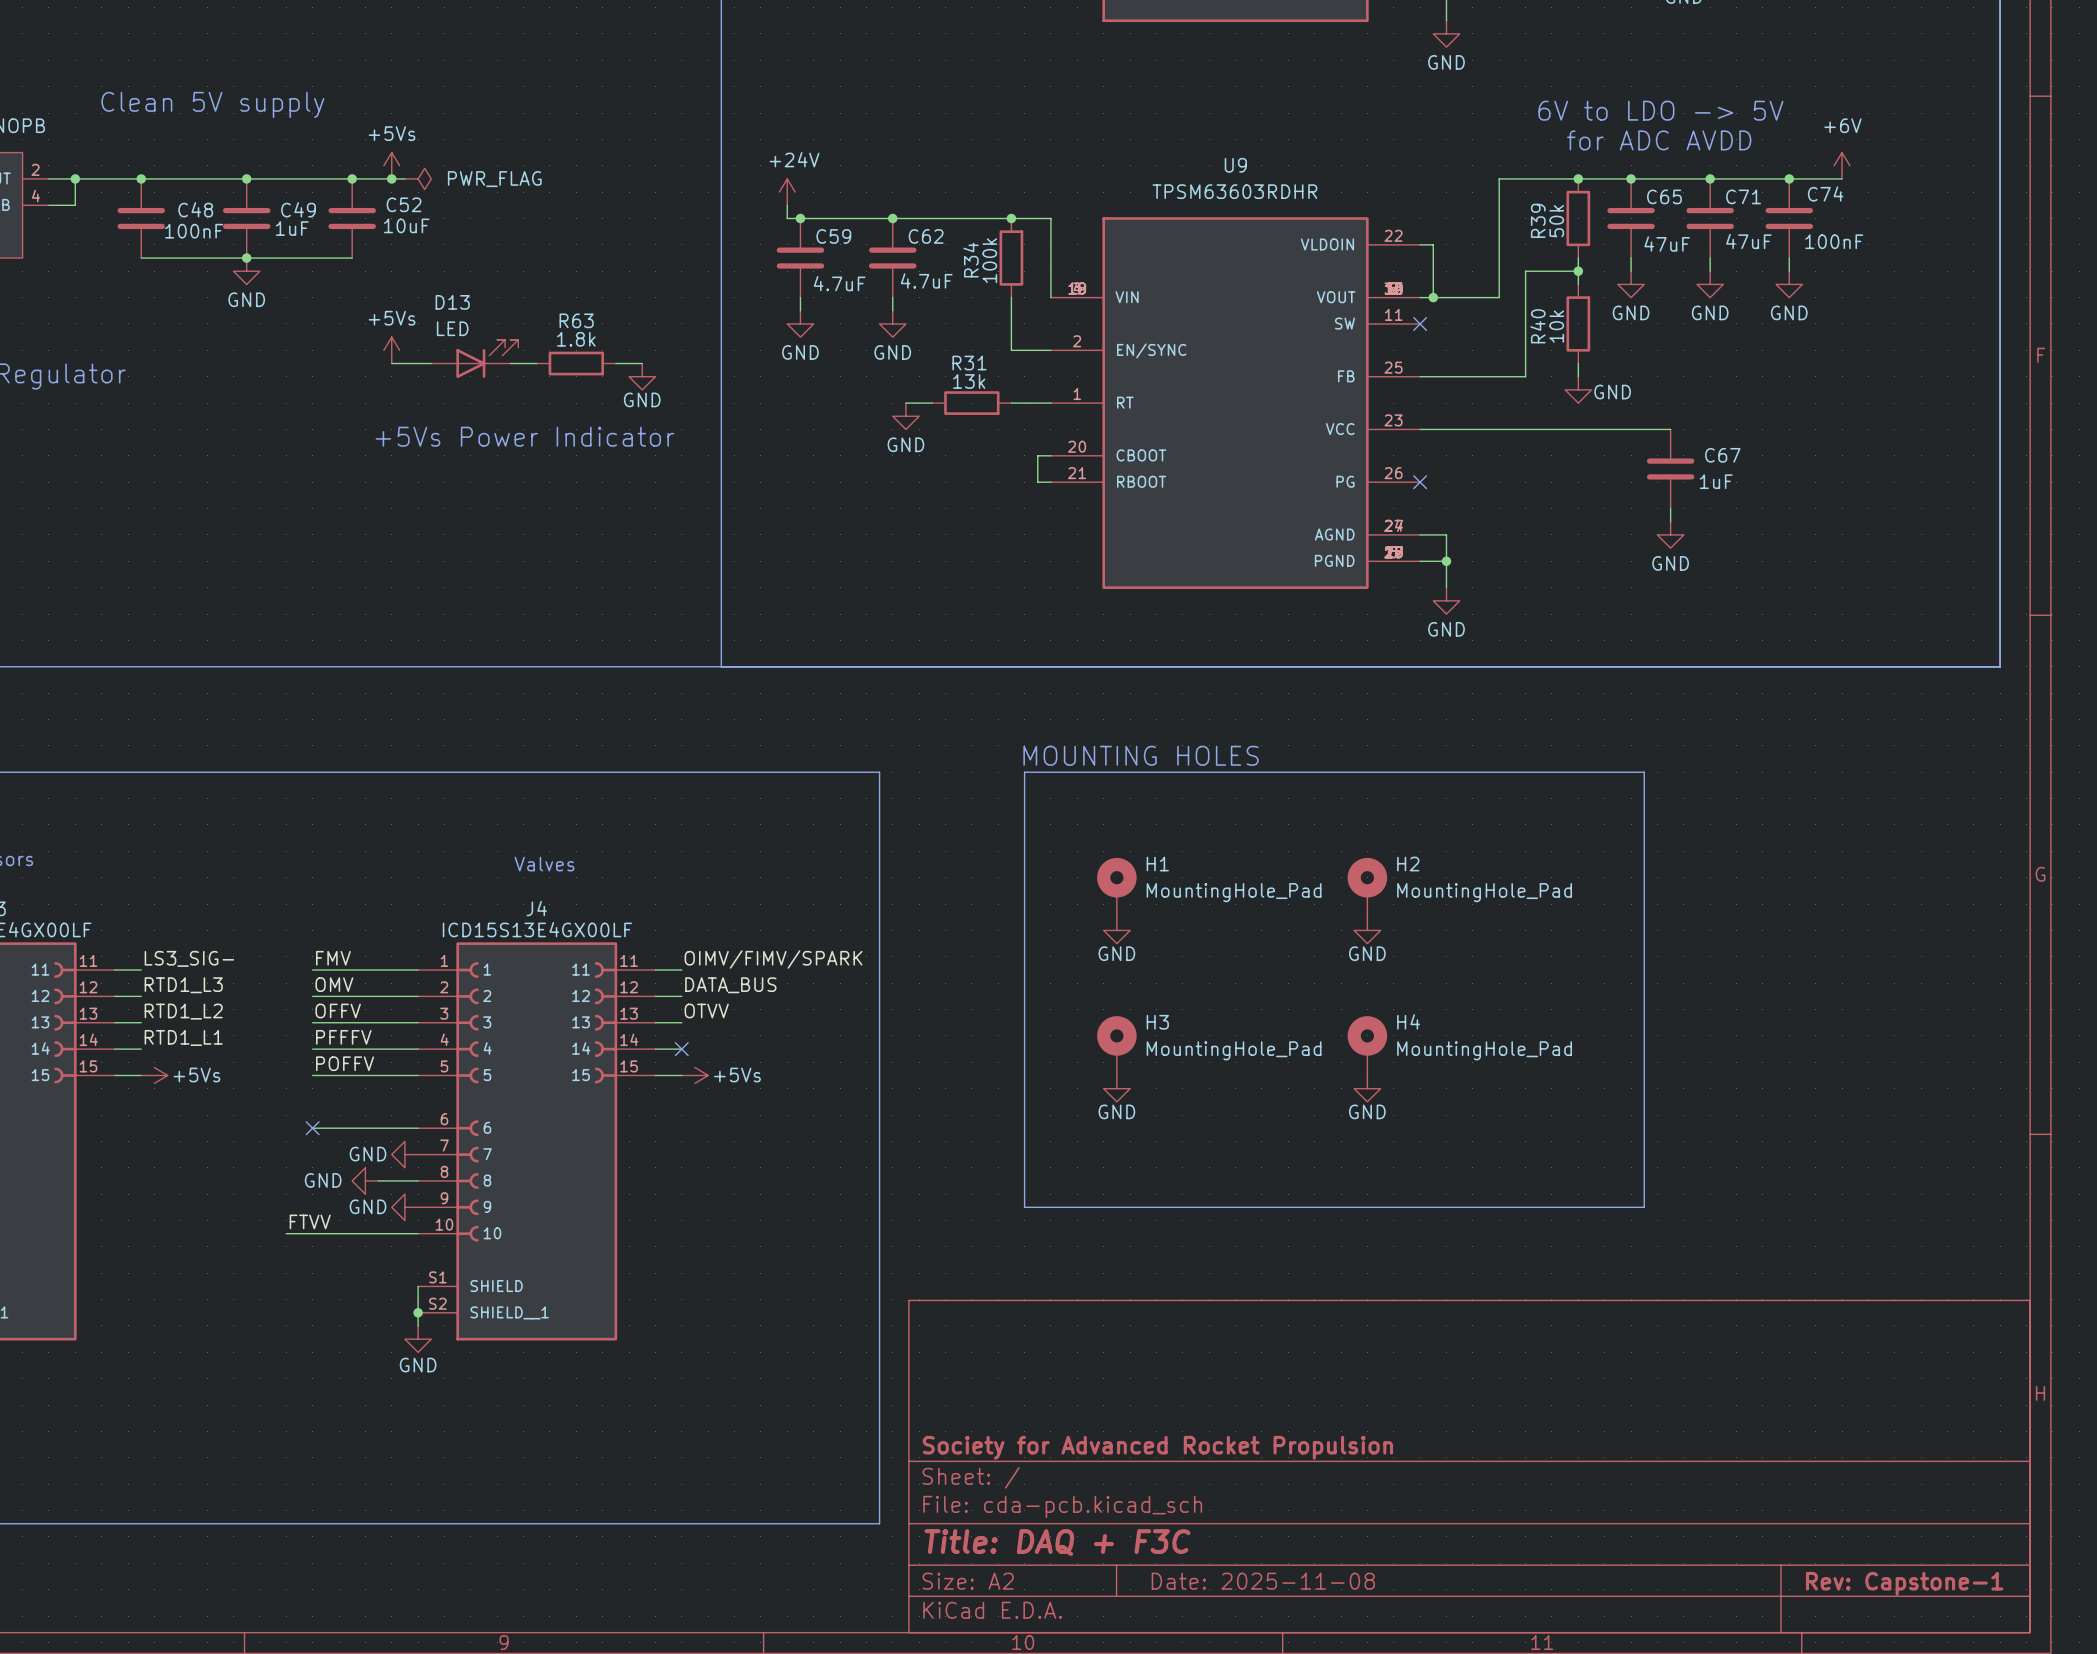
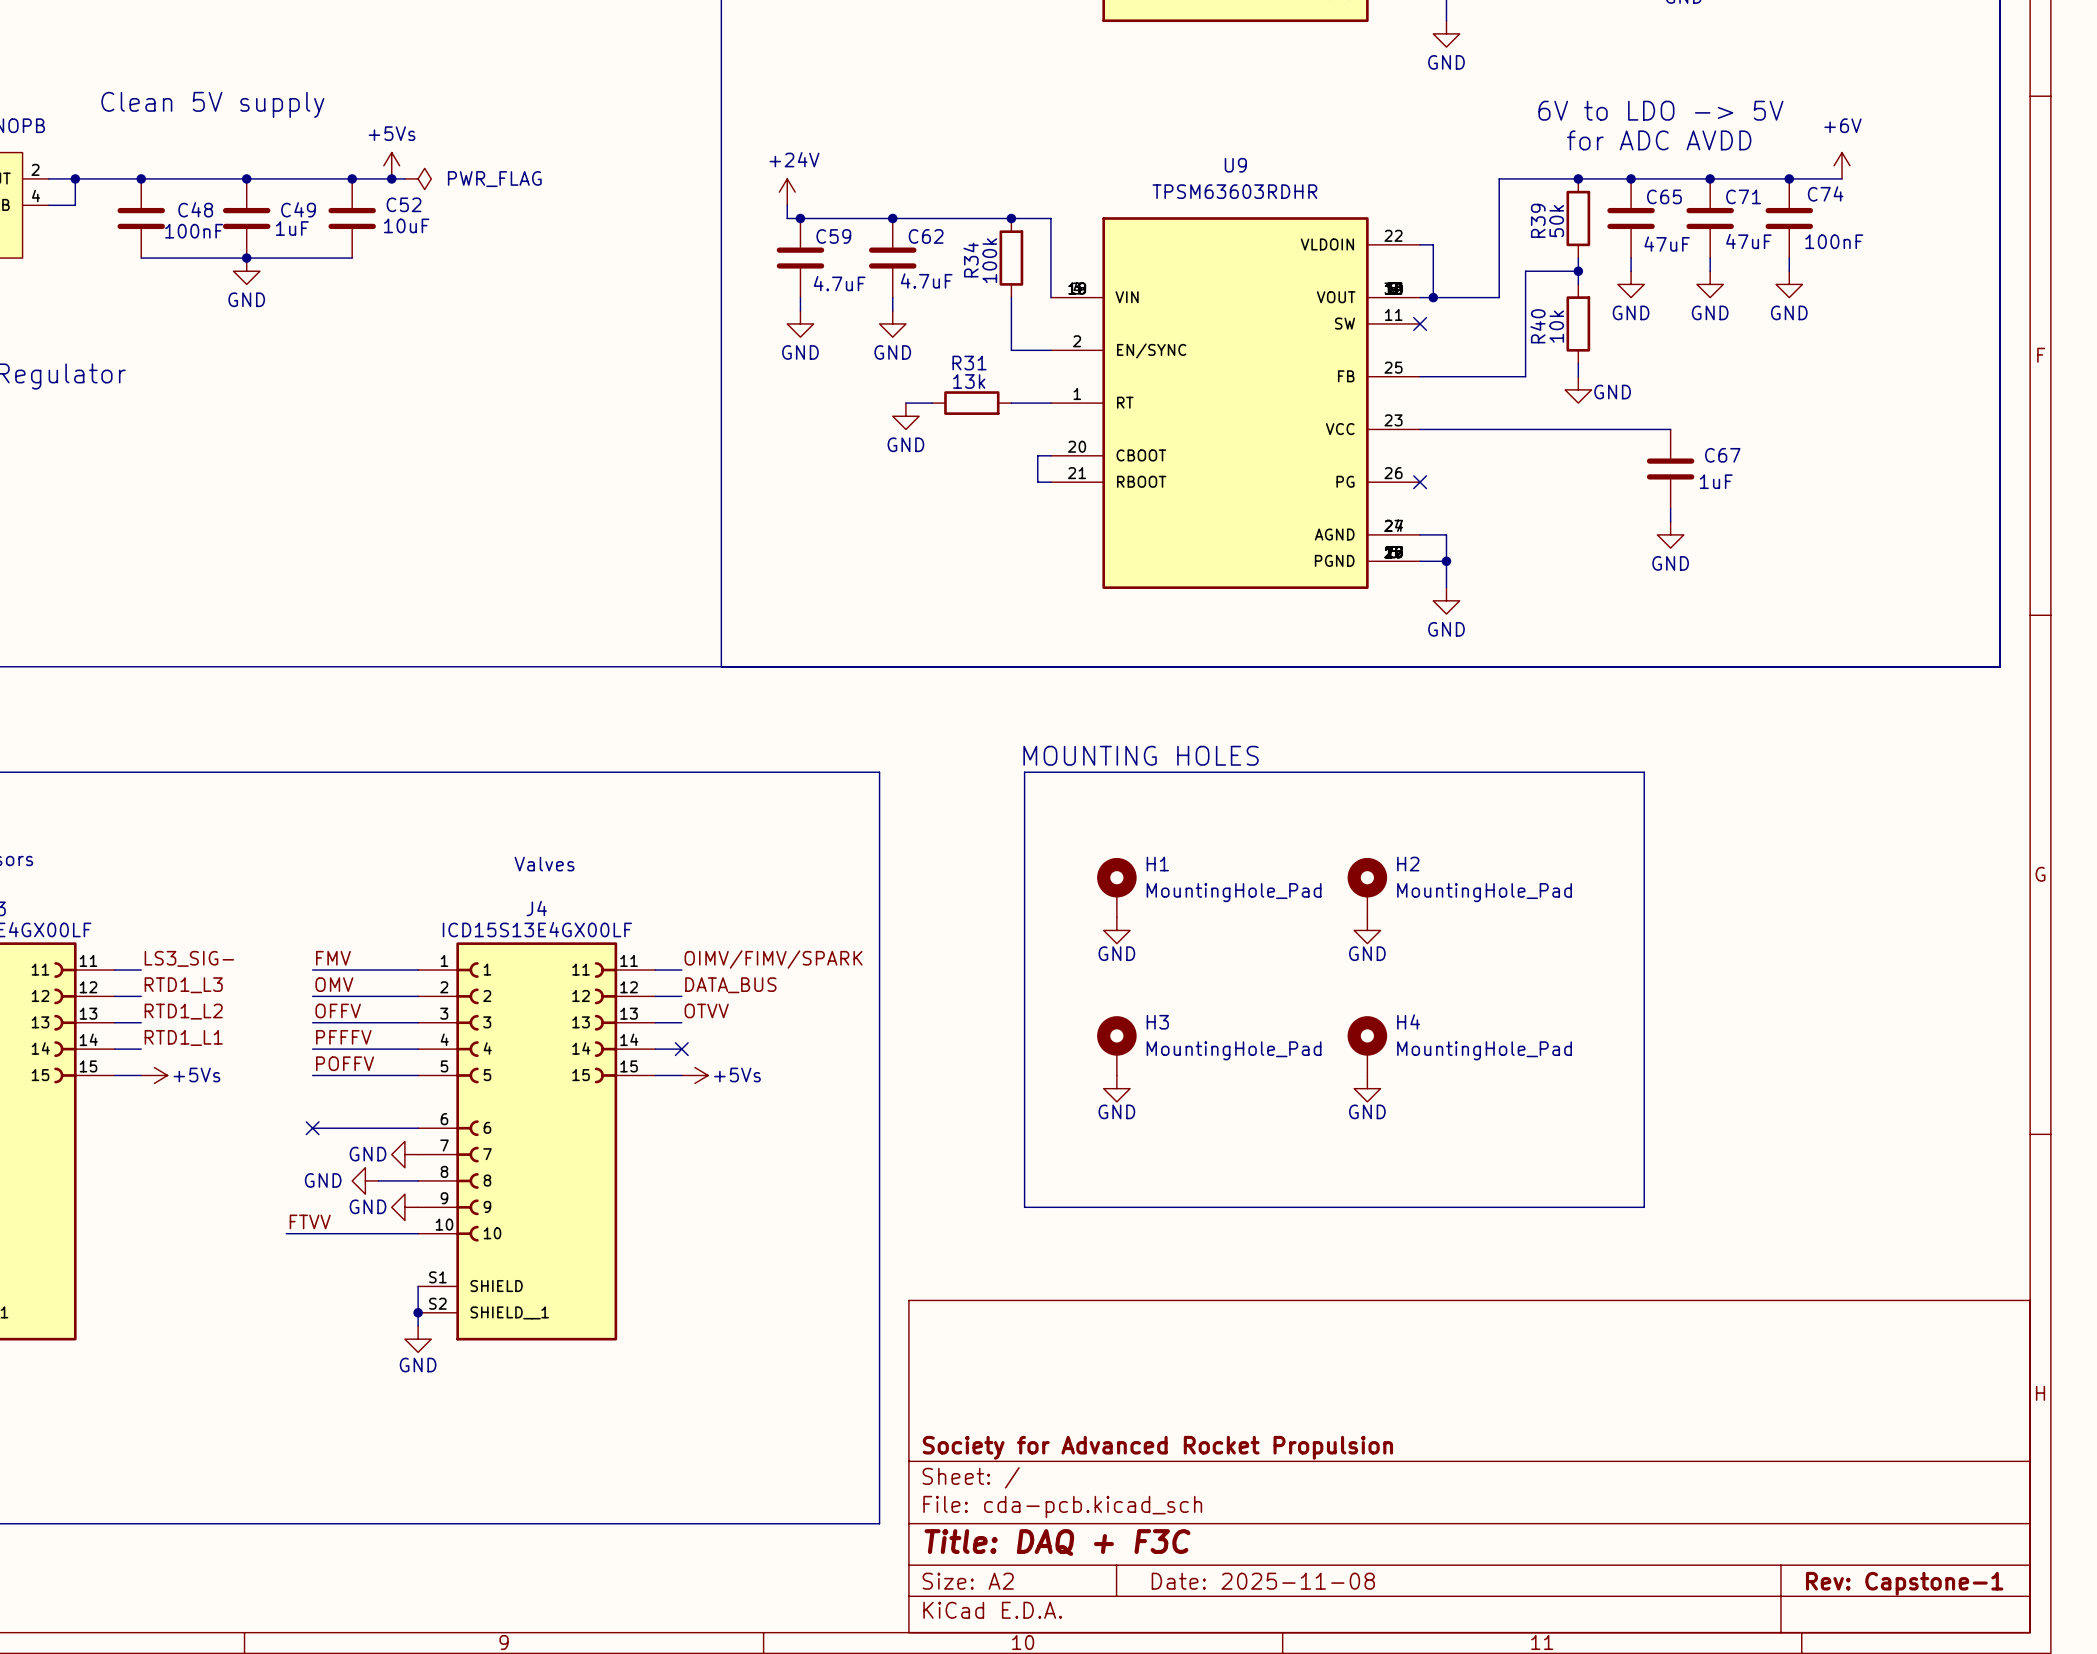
power symbol: +5Vs (391, 350) -> none
D13: LED (474, 358) -> none
wire: (391, 363) (431, 363) -> none
wire: (510, 363) (536, 363) -> none
R63: 1.8k (576, 363) -> none
wire: (615, 363) (642, 363) -> none
power symbol: GND (642, 376) -> none
text: +5Vs Power Indicator (524, 436) -> none

